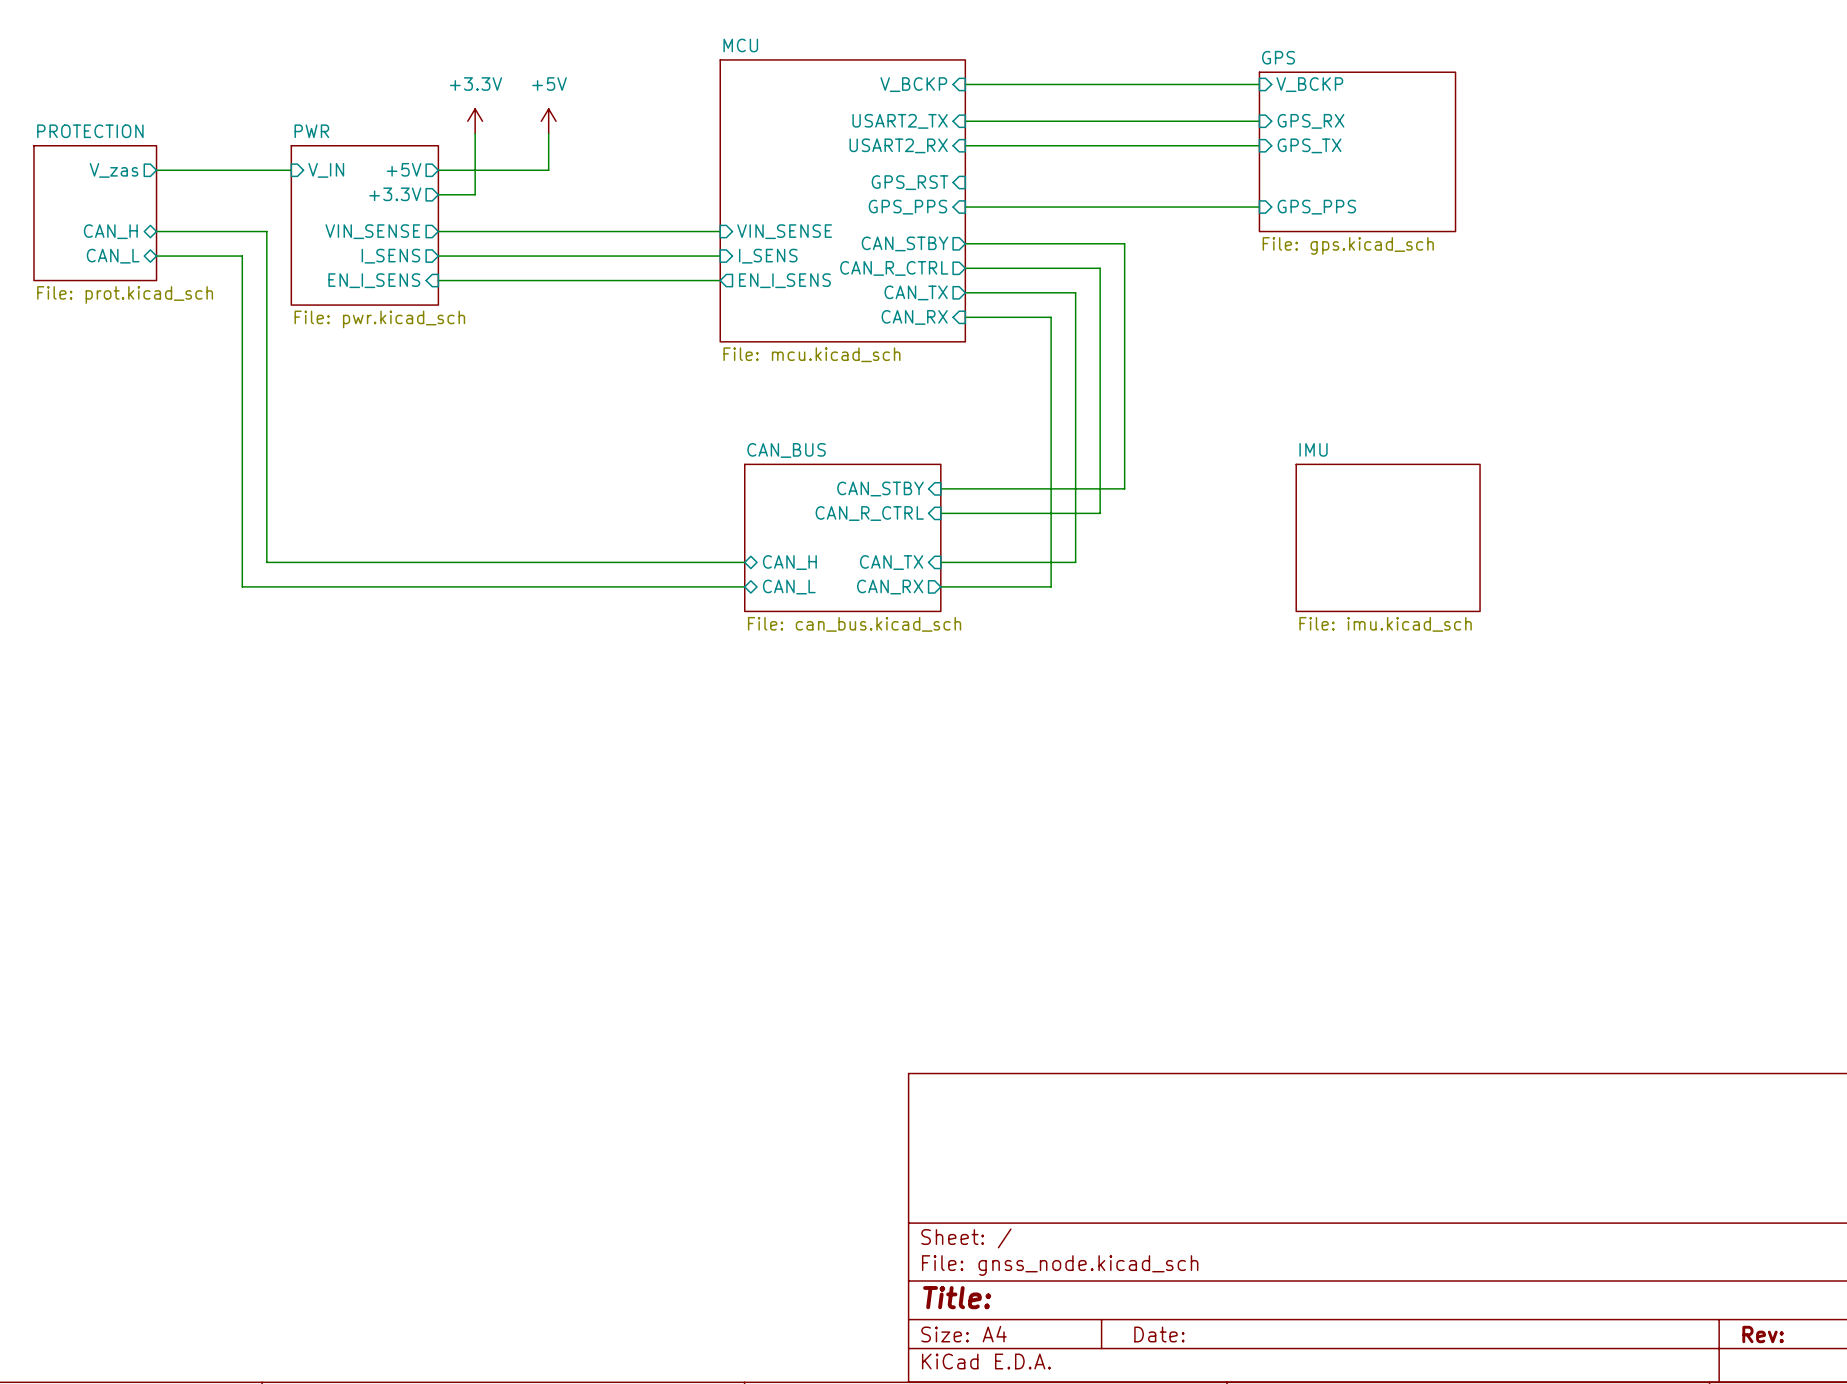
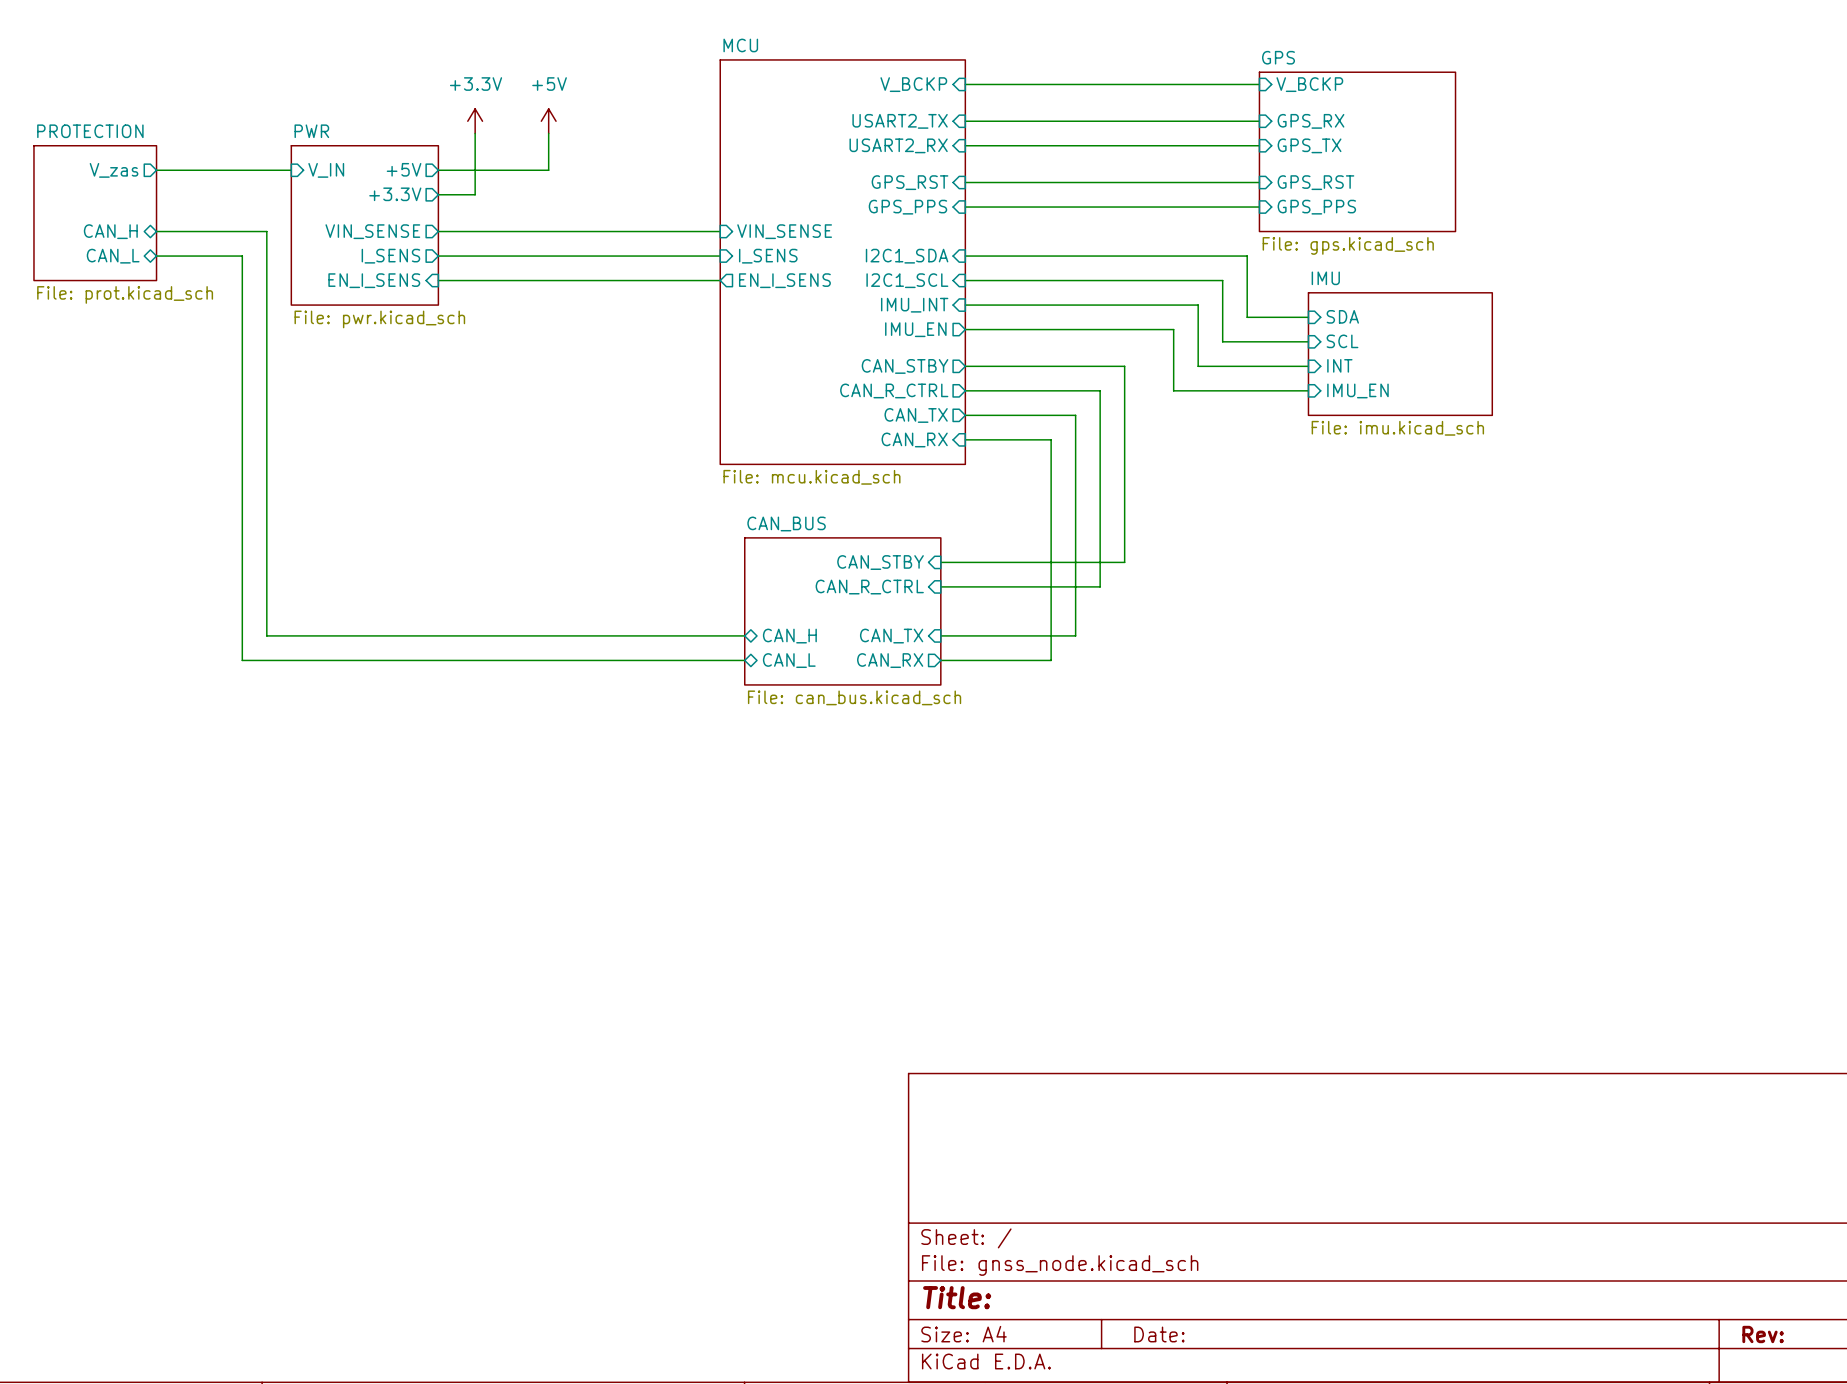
wire: none -> (965, 182) (1259, 182)
sheet pin: none -> GPS_RST (1315, 182)
sheet MCU: File: mcu.kicad_sch (842, 200) -> none
sheet pin: CAN_STBY (905, 243) -> none
wire: (965, 243) (1124, 243) (1124, 366) -> (965, 366) (1124, 366)
sheet pin: none -> I2C1_SDA (907, 256)
wire: none -> (965, 256) (1247, 256) (1247, 317) (1308, 317)
sheet MCU: none -> File: mcu.kicad_sch (842, 262)
sheet pin: CAN_R_CTRL (894, 268) -> none
wire: (965, 268) (1100, 268) (1100, 390) -> (965, 390) (1100, 390)
sheet pin: none -> I2C1_SCL (907, 280)
wire: none -> (965, 280) (1222, 280) (1222, 341) (1308, 341)
sheet pin position: CAN_TX (916, 292) -> CAN_TX (916, 415)
wire: (965, 292) (1075, 292) (1075, 415) -> (965, 415) (1075, 415)
sheet pin: none -> IMU_INT (914, 305)
wire: none -> (965, 305) (1198, 305) (1198, 366) (1308, 366)
sheet pin: none -> SDA (1342, 316)
sheet pin position: CAN_RX (914, 317) -> CAN_RX (914, 439)
wire: (965, 317) (1051, 317) (1051, 439) -> (965, 439) (1051, 439)
sheet pin: none -> IMU_EN (915, 329)
wire: none -> (965, 329) (1173, 329) (1173, 390) (1308, 390)
sheet pin: none -> SCL (1342, 341)
sheet IMU: none -> File: imu.kicad_sch (1400, 354)
sheet pin: none -> INT (1339, 365)
sheet pin: none -> CAN_STBY (905, 366)
sheet pin: none -> CAN_R_CTRL (894, 390)
sheet pin: none -> IMU_EN (1357, 390)
wire: (940, 488) (1124, 488) -> (940, 635) (1075, 635) (1075, 562) (1124, 562) (1124, 488)
sheet pin: CAN_STBY (880, 489) -> none
sheet pin: CAN_R_CTRL (869, 513) -> none
wire: (940, 513) (1100, 513) -> (940, 660) (1051, 660) (1051, 586) (1100, 586) (1100, 513)
sheet CAN_BUS position: (842, 537) -> (842, 611)
sheet IMU: File: imu.kicad_sch (1388, 537) -> none
wire: (266, 562) (744, 562) -> (266, 562) (266, 635) (744, 635)
sheet pin position: CAN_H (789, 562) -> CAN_H (789, 636)
sheet pin: CAN_TX (891, 562) -> CAN_STBY (880, 562)
wire: (242, 586) (744, 586) -> (242, 586) (242, 660) (744, 660)
sheet pin position: CAN_L (789, 587) -> CAN_L (789, 660)
sheet pin shape: output (890, 587) -> input (869, 587)
sheet pin: CAN_RX (890, 587) -> CAN_R_CTRL (869, 587)
sheet pin: none -> CAN_TX (891, 636)
sheet pin: none -> CAN_RX (890, 660)

